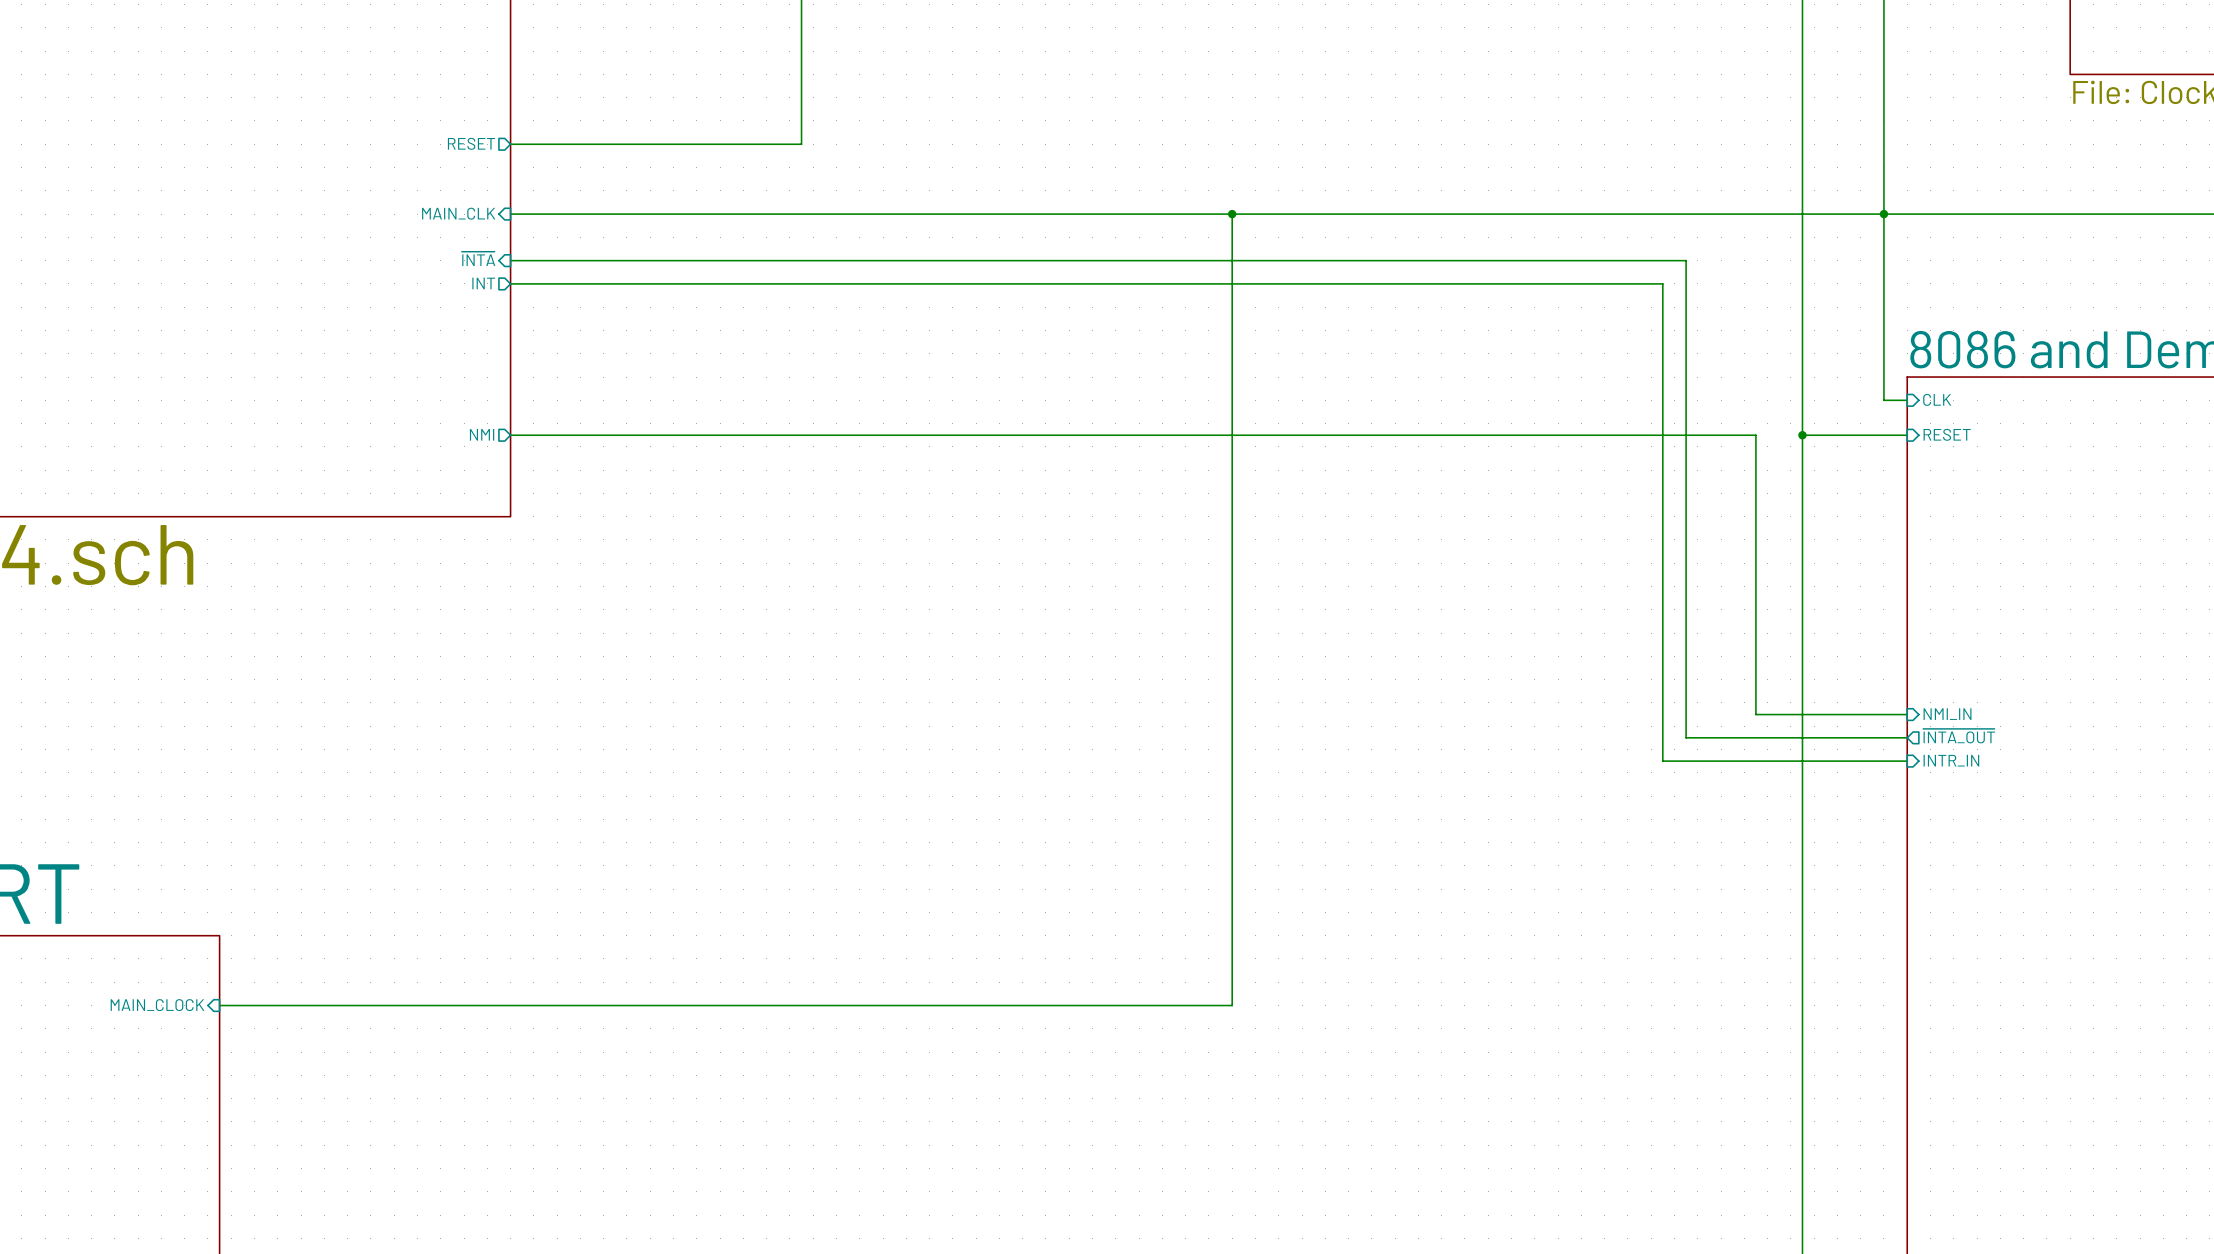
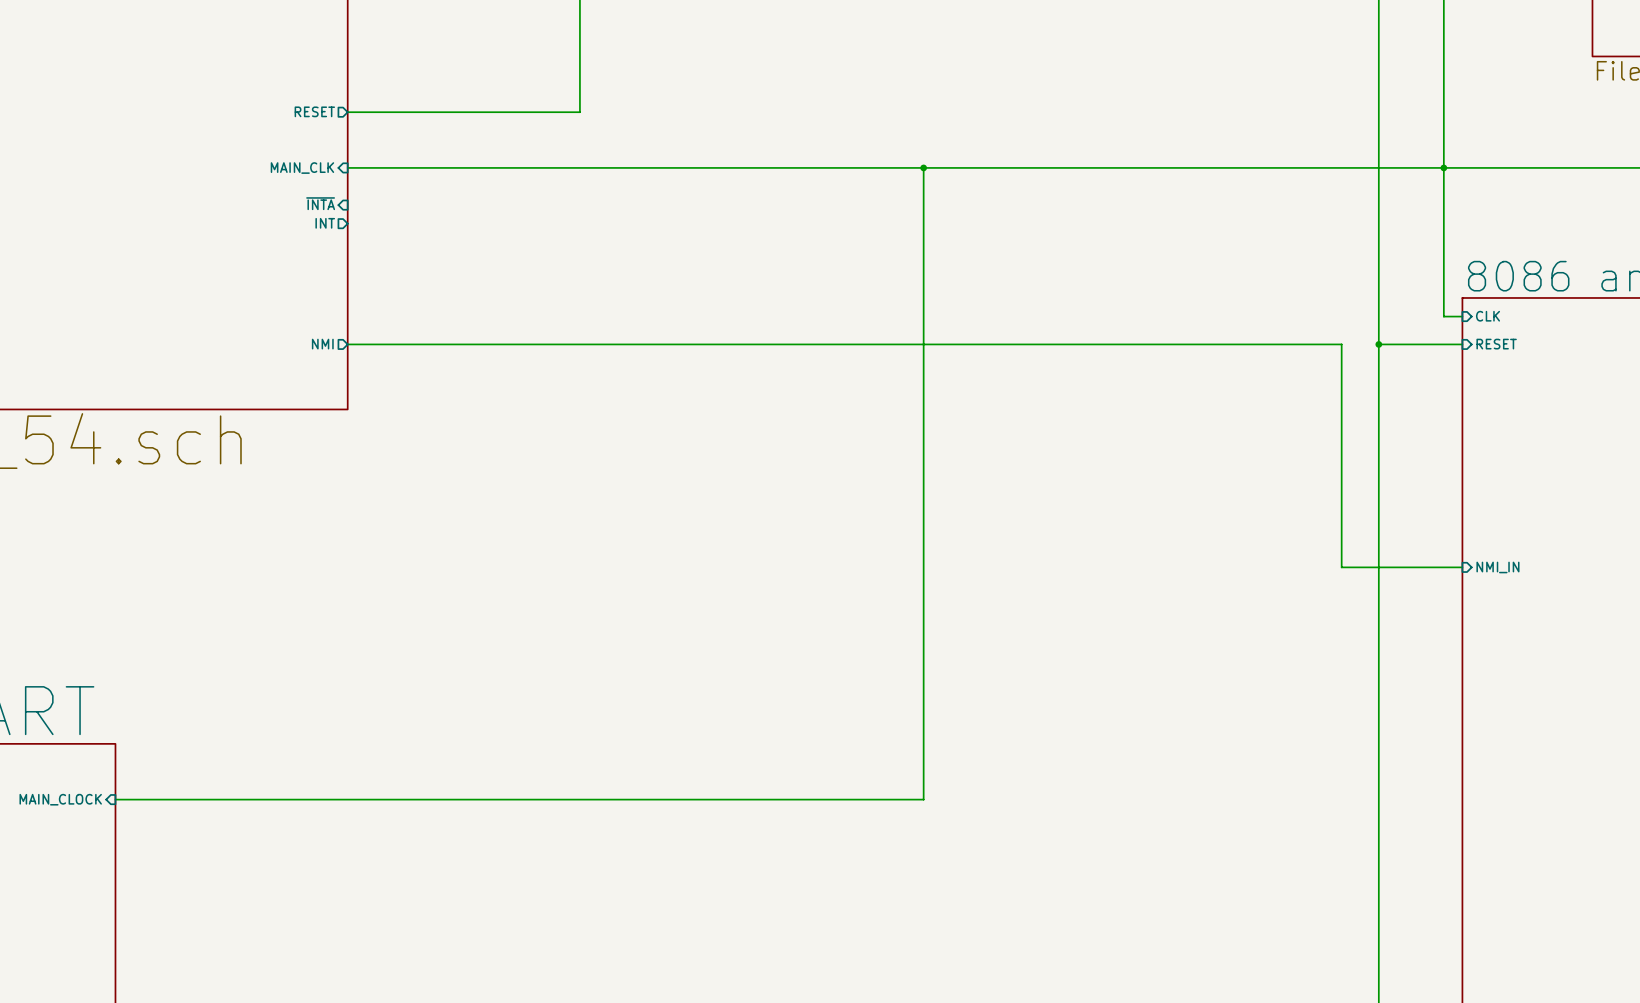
wire: (510, 260) (1686, 260) (1686, 737) (1907, 737) -> none
wire: (510, 283) (1662, 283) (1662, 761) (1907, 761) -> none
sheet pin: ~{INTA_OUT} (1959, 736) -> none
sheet pin: INTR_IN (1951, 760) -> none

